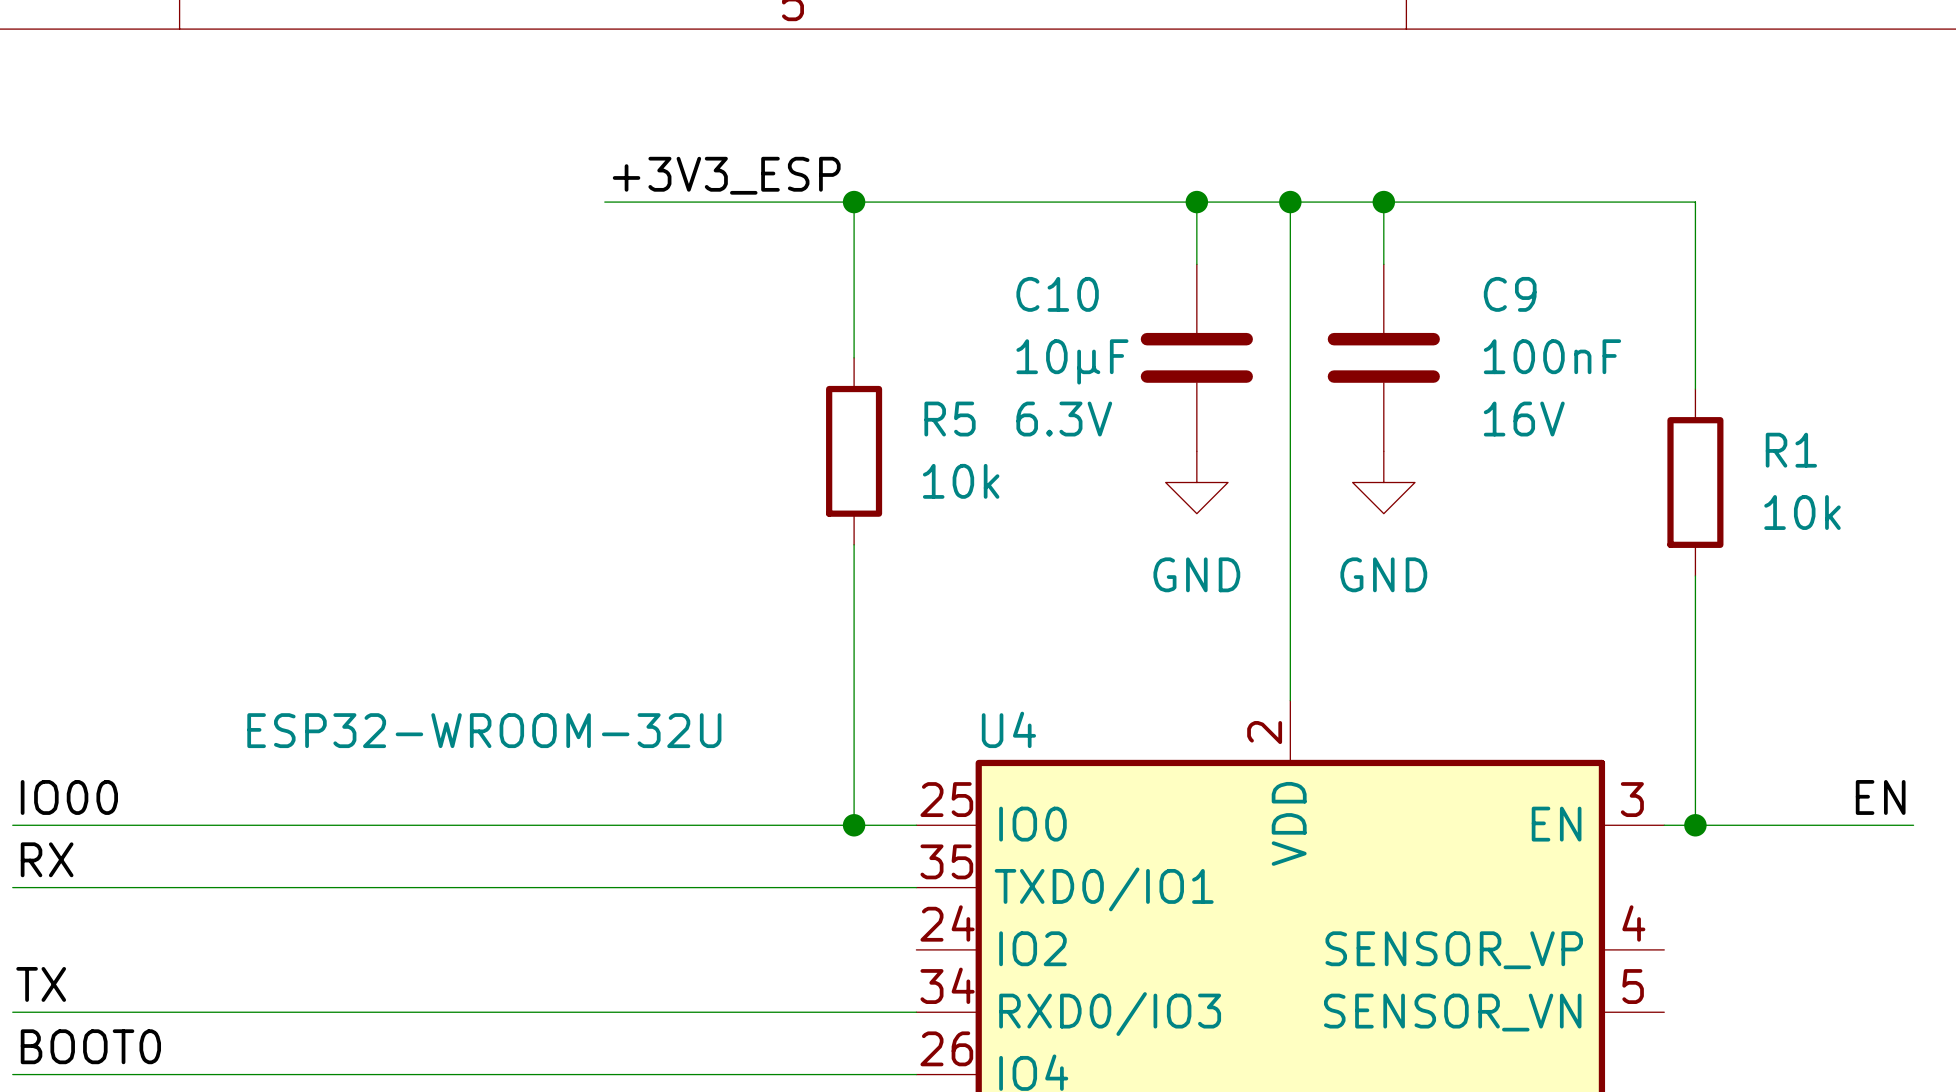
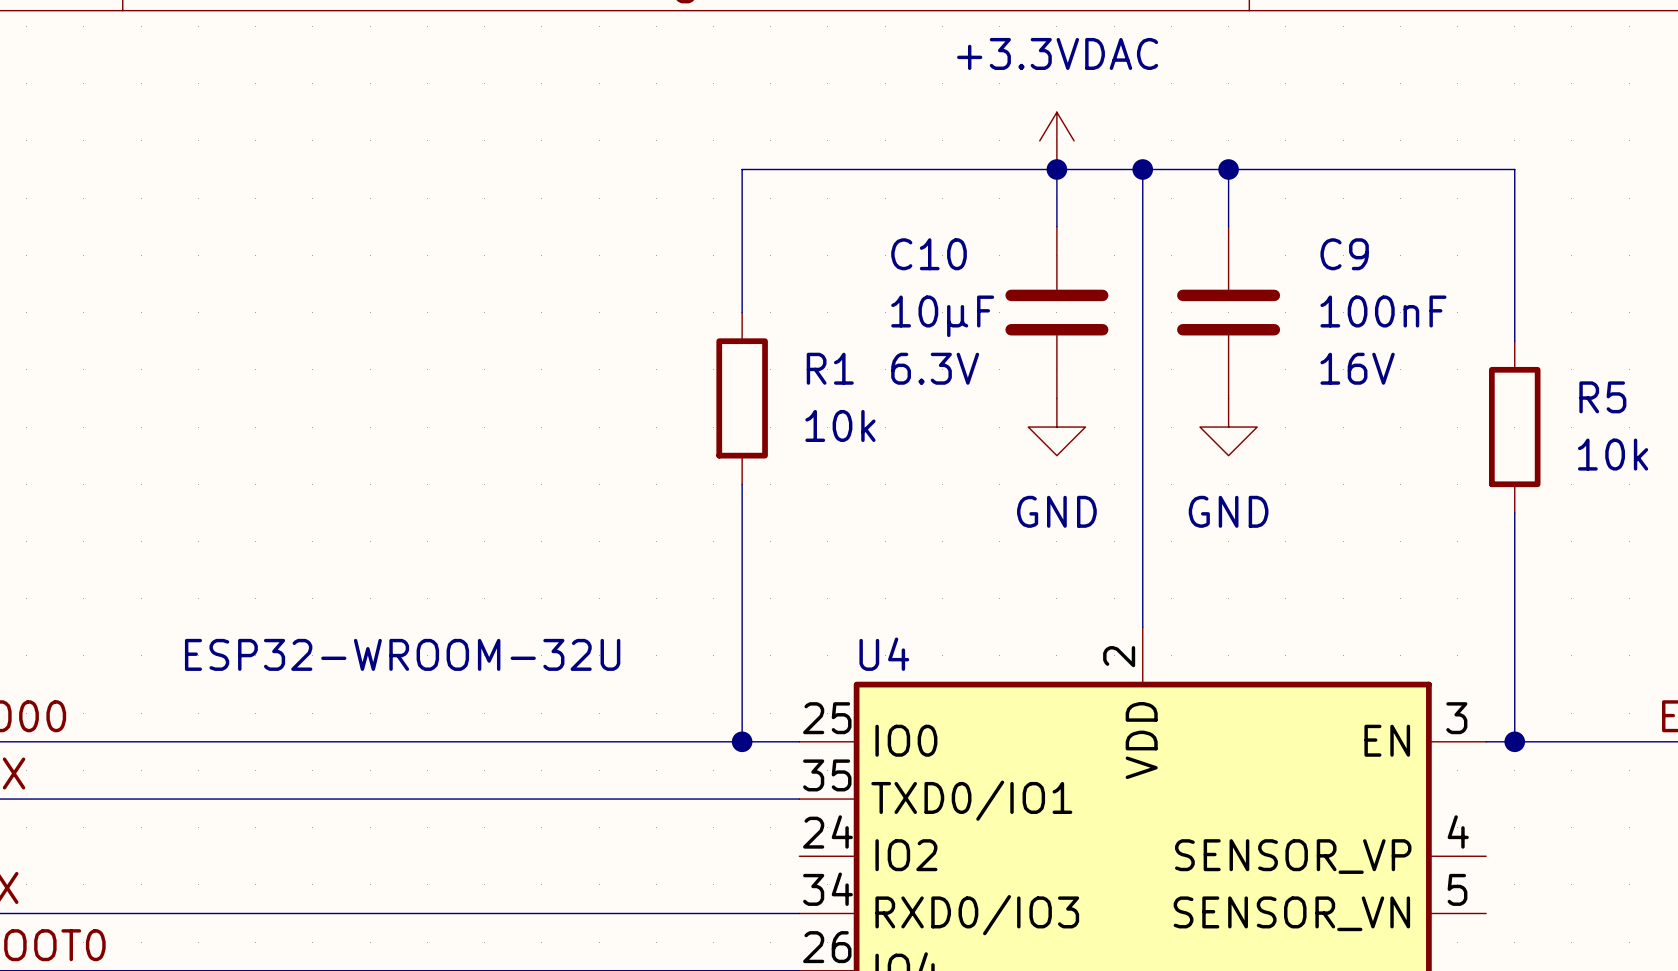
power symbol: none -> +3.3VDAC (1056, 140)
label: +3V3_ESP (726, 175) -> none
wire: (604, 202) (854, 202) -> none
junction: (854, 202) -> none
R5 name: R5 (950, 419) -> R1 (830, 368)
R1 name: R1 (1791, 450) -> R5 (1602, 397)

